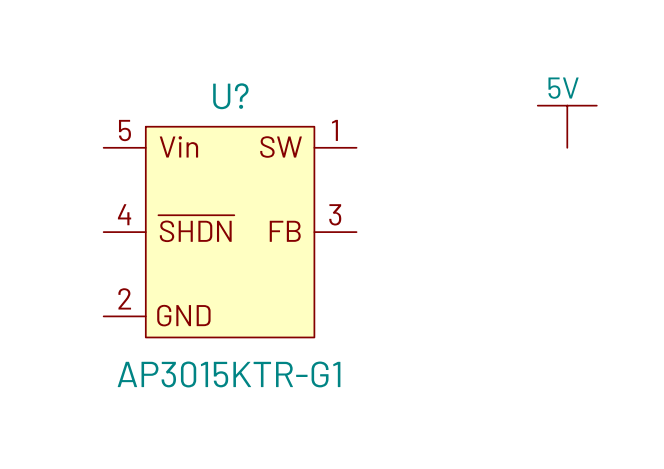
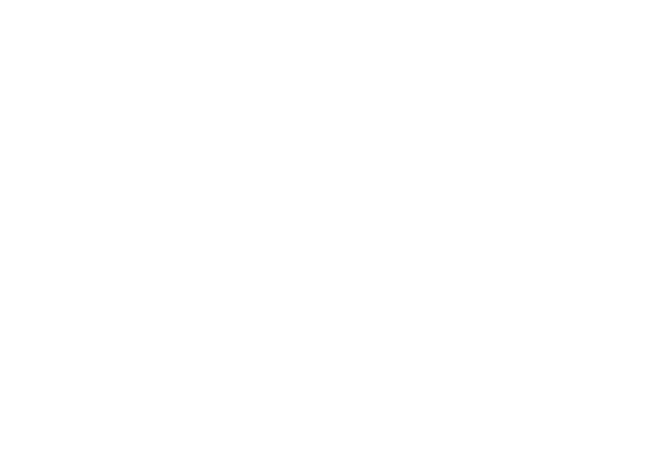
power symbol: 5V (567, 126) -> none
U?: AP3015KTR-G1 (230, 232) -> none

